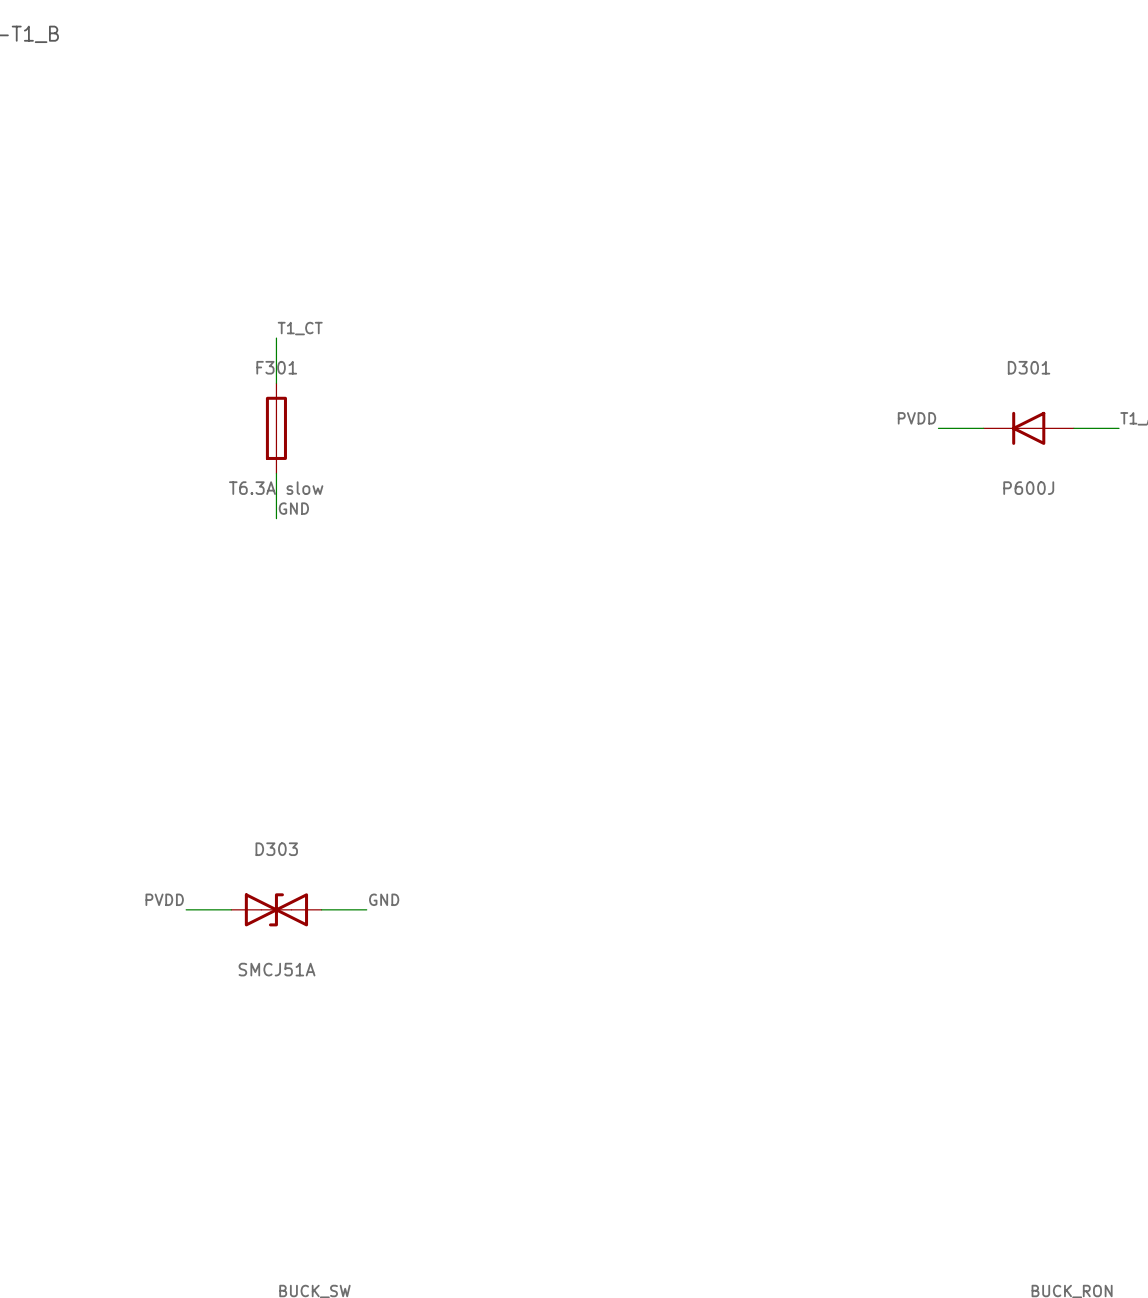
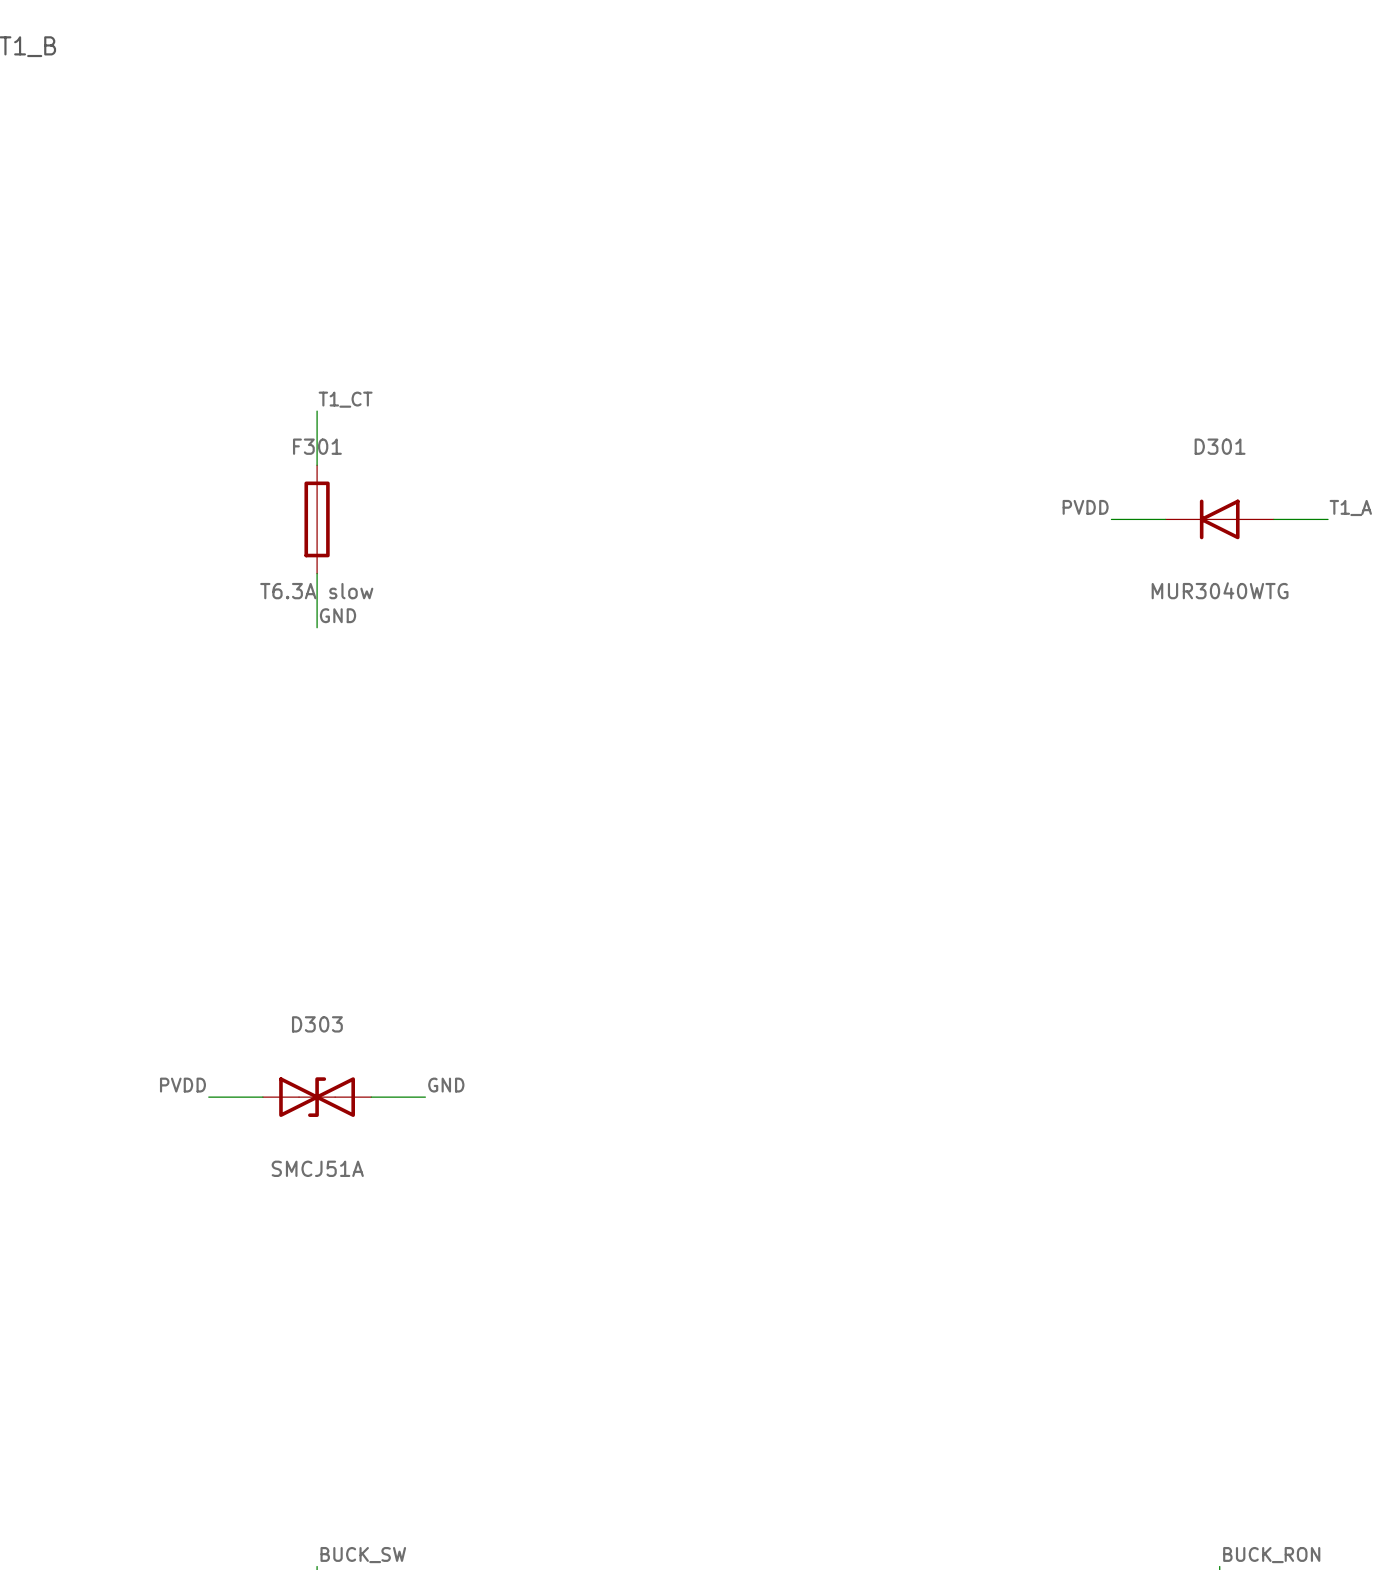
D301 value: P600J (1028, 488) -> MUR3040WTG (1220, 590)

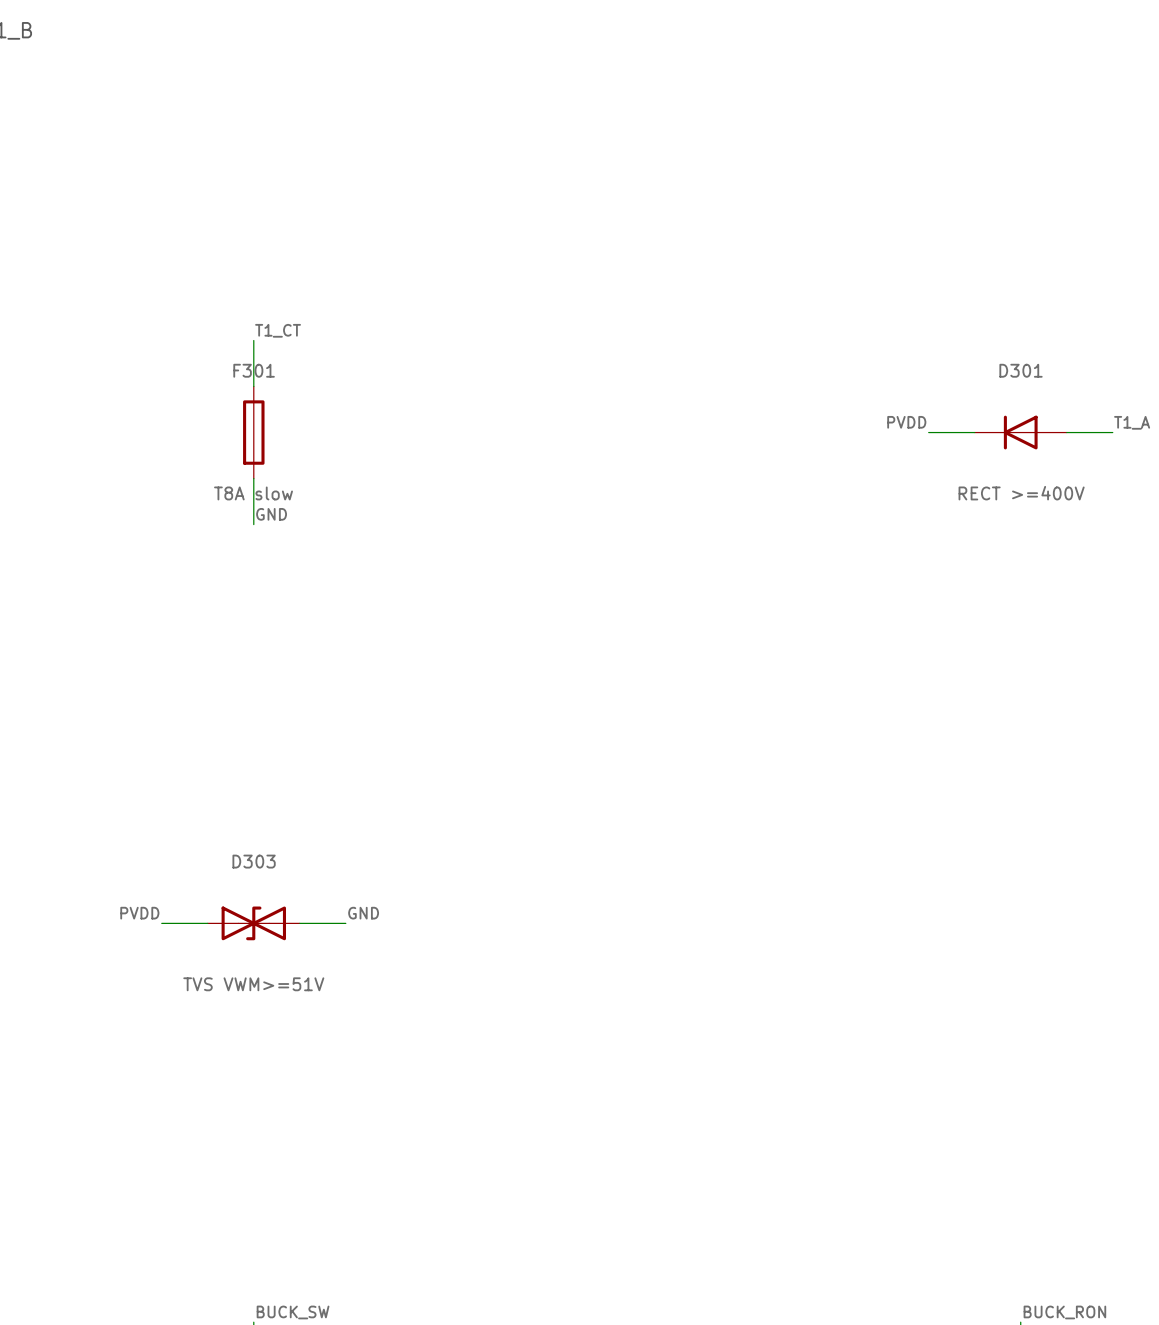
D301 value: MUR3040WTG (1220, 590) -> RECT >=400V (1021, 493)
F301 value: T6.3A slow (316, 591) -> T8A slow (253, 493)
D303 value: SMCJ51A (317, 1168) -> TVS VWM>=51V (253, 984)

